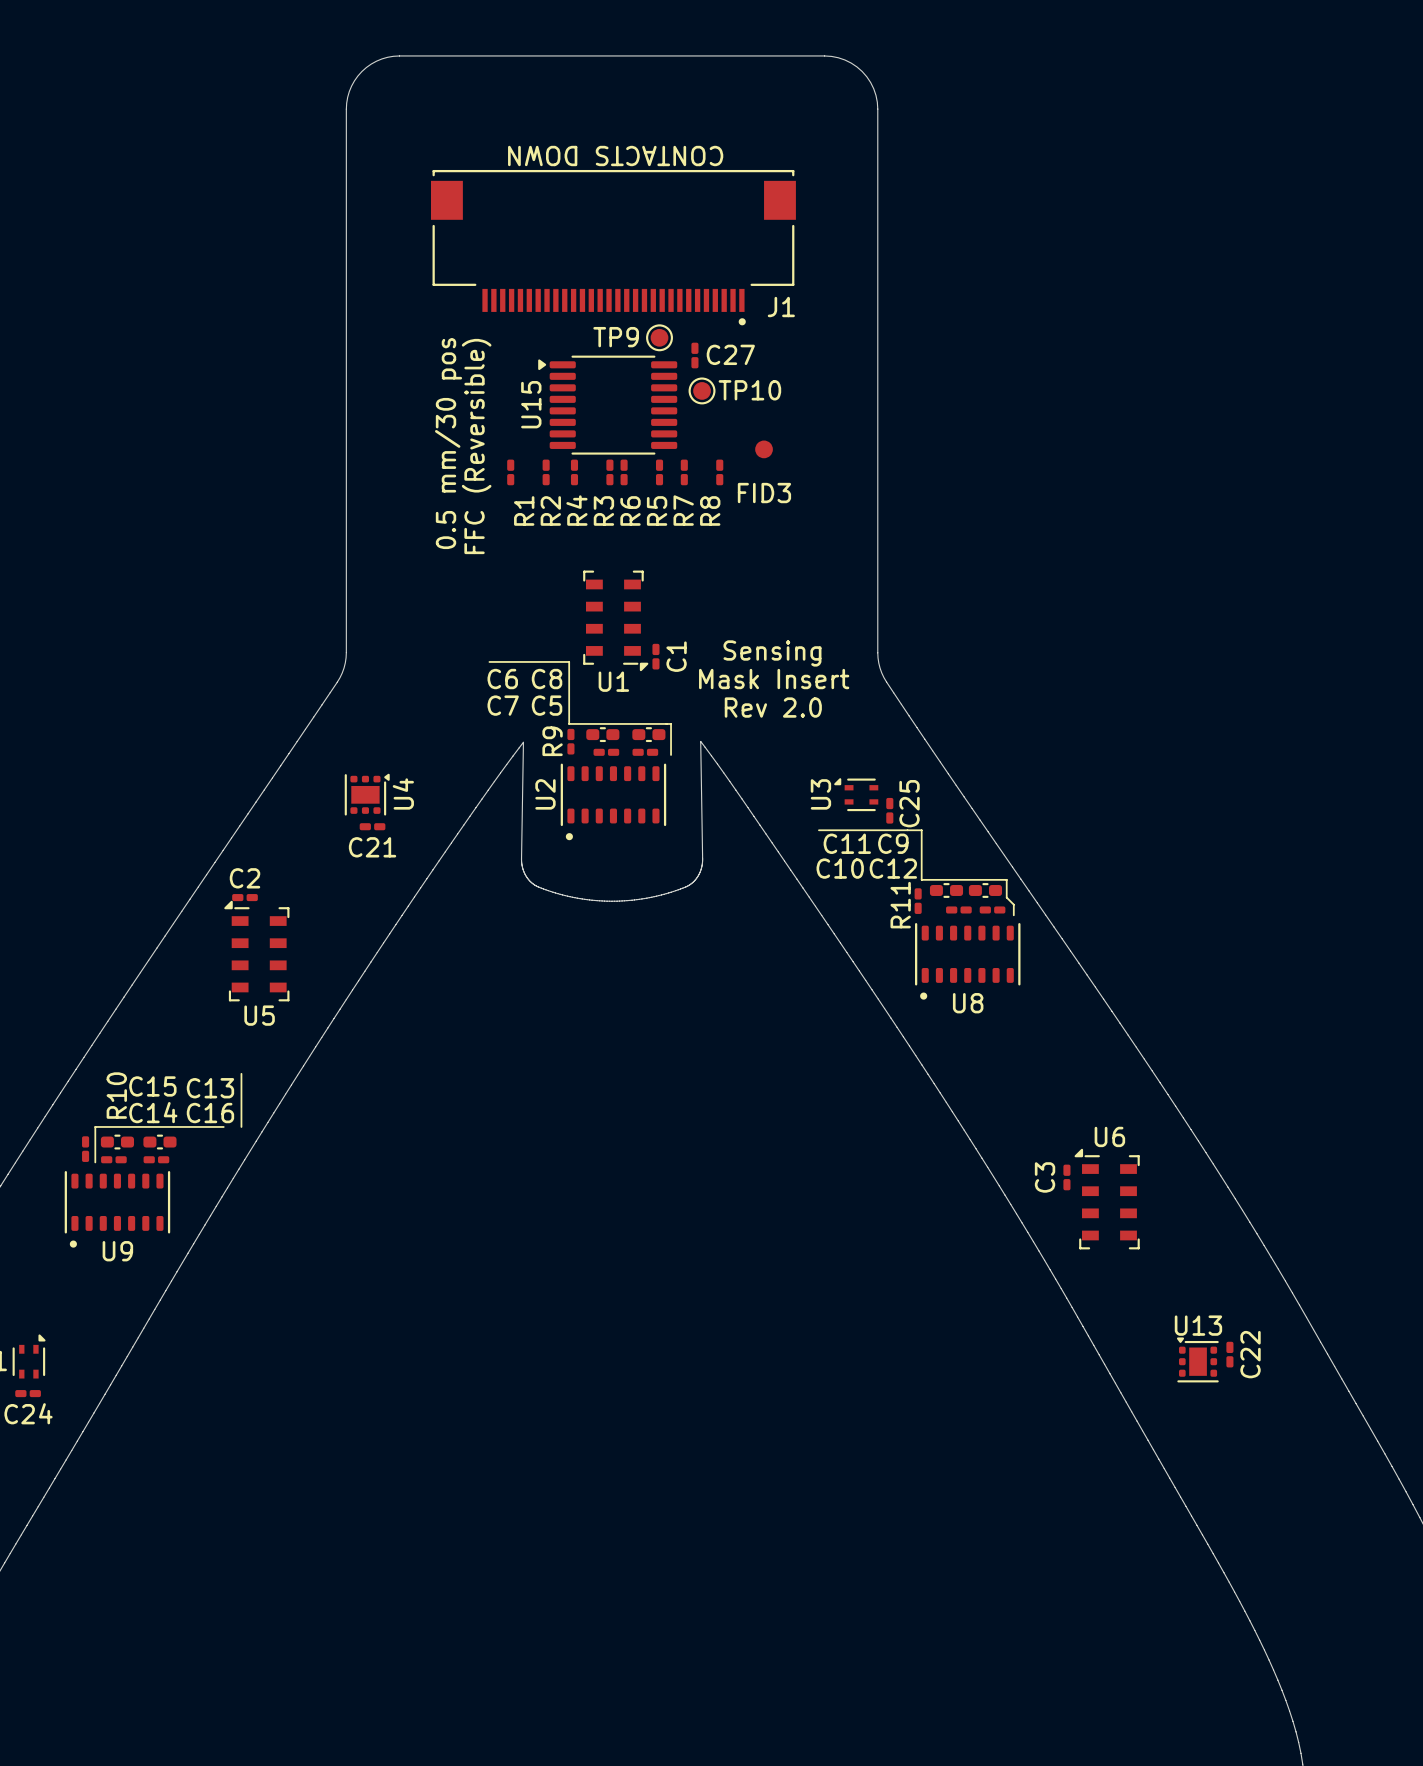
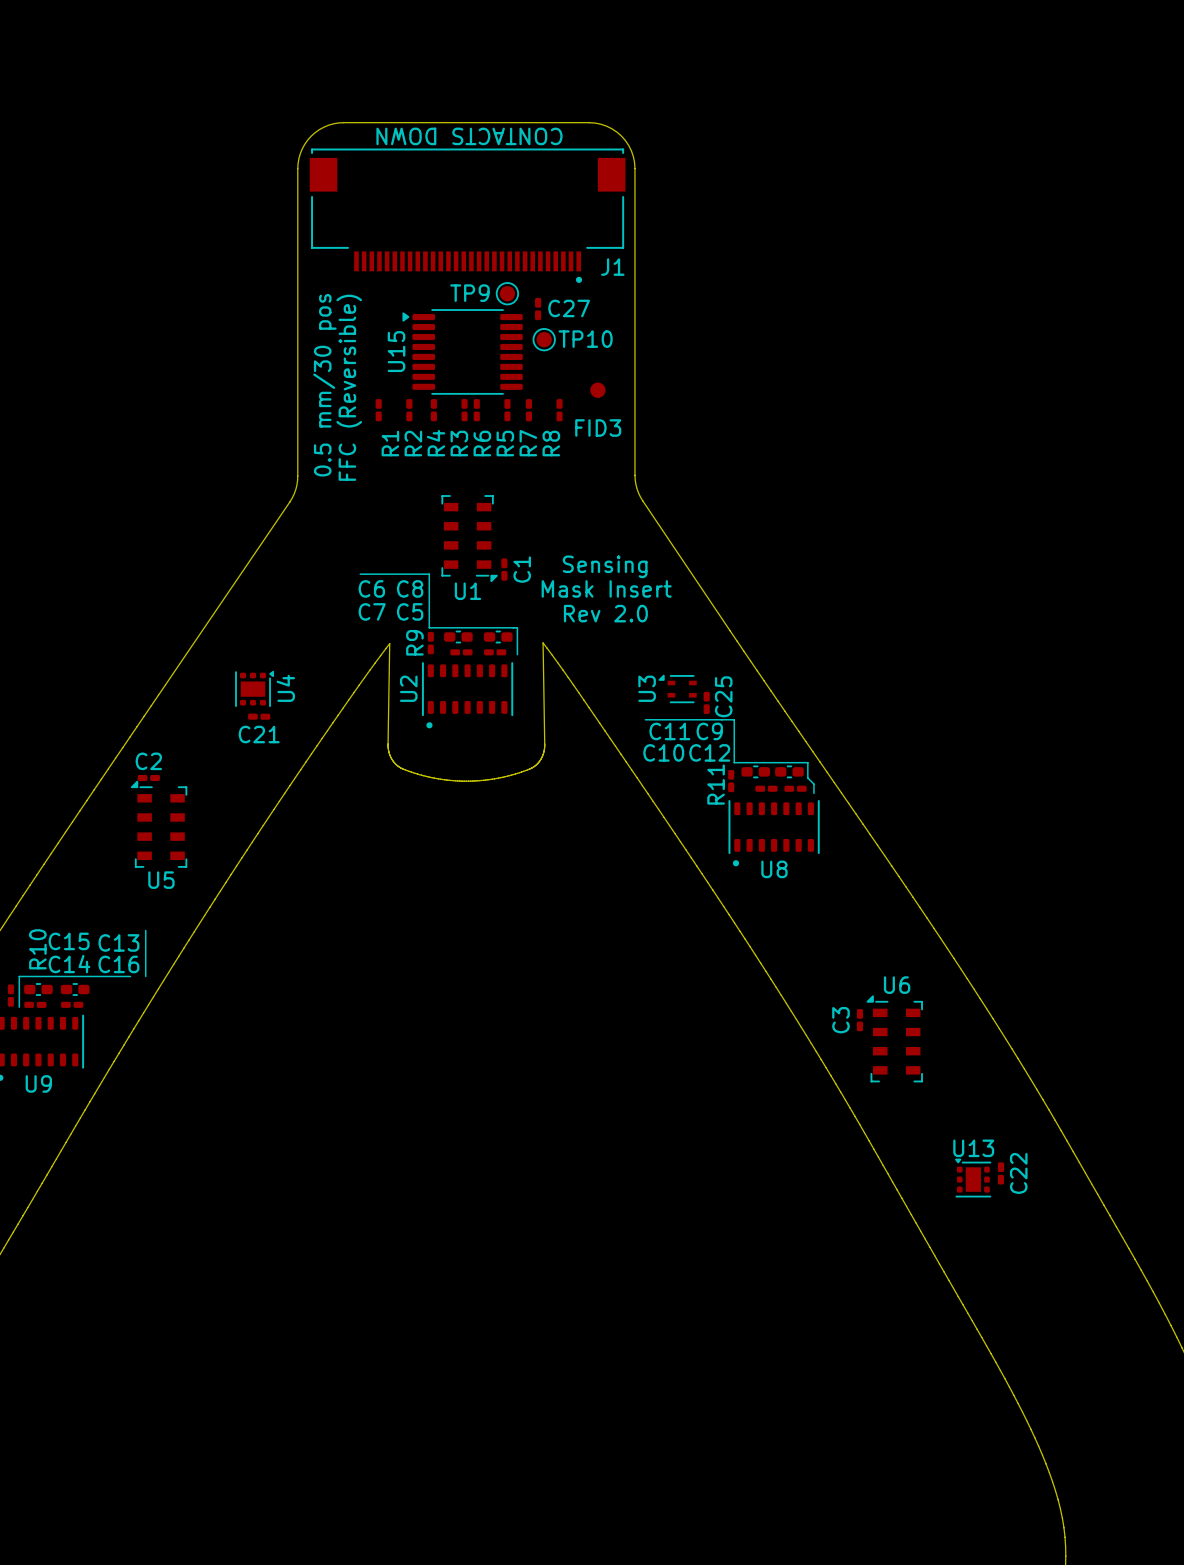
board edge: (909, 715) (883, 677) (878, 657) (877, 109) (875, 95) (866, 76) (856, 66) (844, 60) (824, 55) (393, 56) (376, 61) (361, 71) (351, 86) (346, 103) (345, 662) (337, 682) (280, 765) -> (723, 620) (642, 500) (635, 484) (634, 168) (631, 151) (625, 140) (611, 128) (600, 124) (588, 122) (338, 122) (323, 127) (311, 136) (302, 148) (298, 163) (297, 476) (295, 489) (289, 502) (179, 663)

